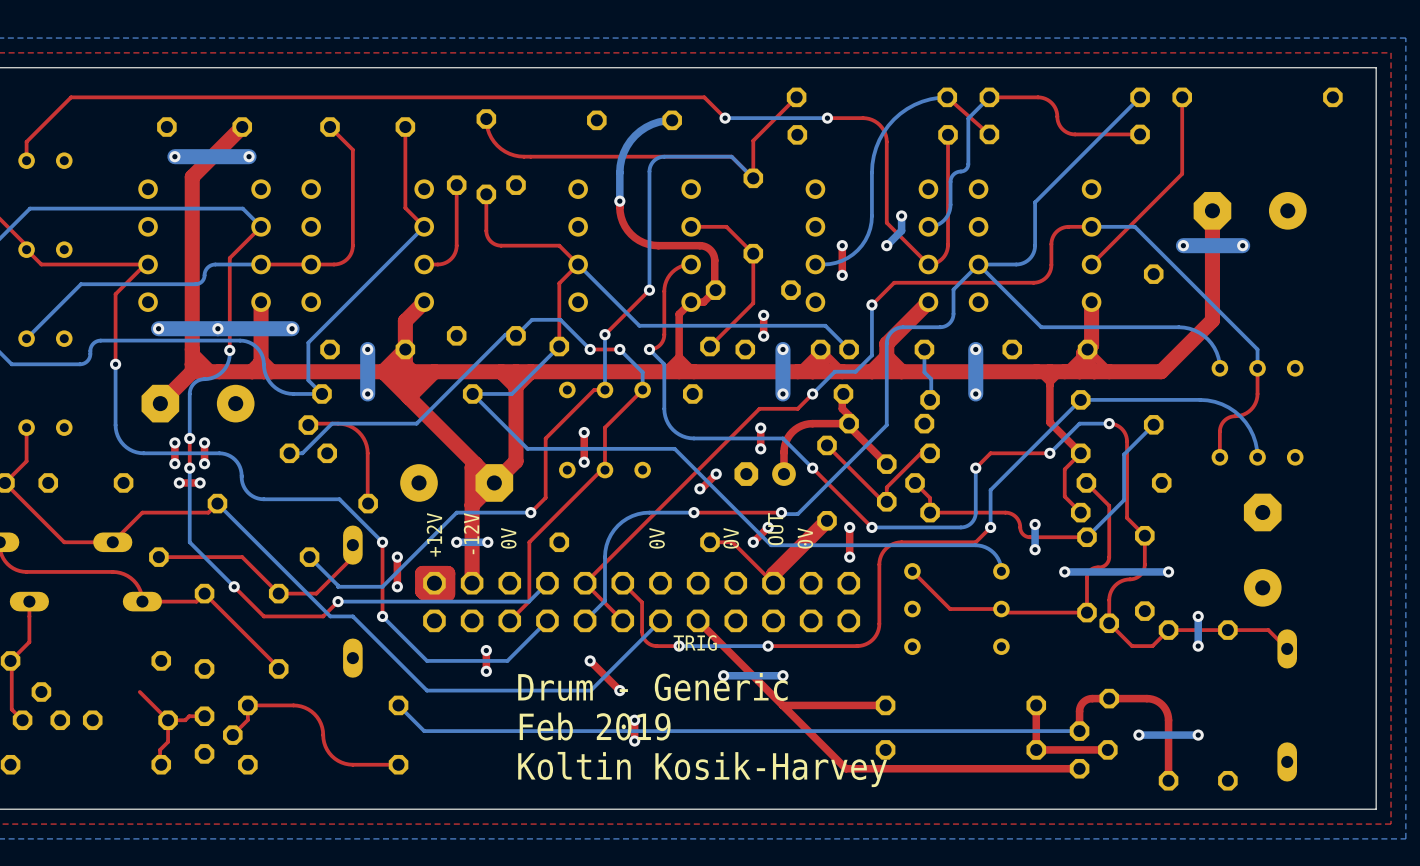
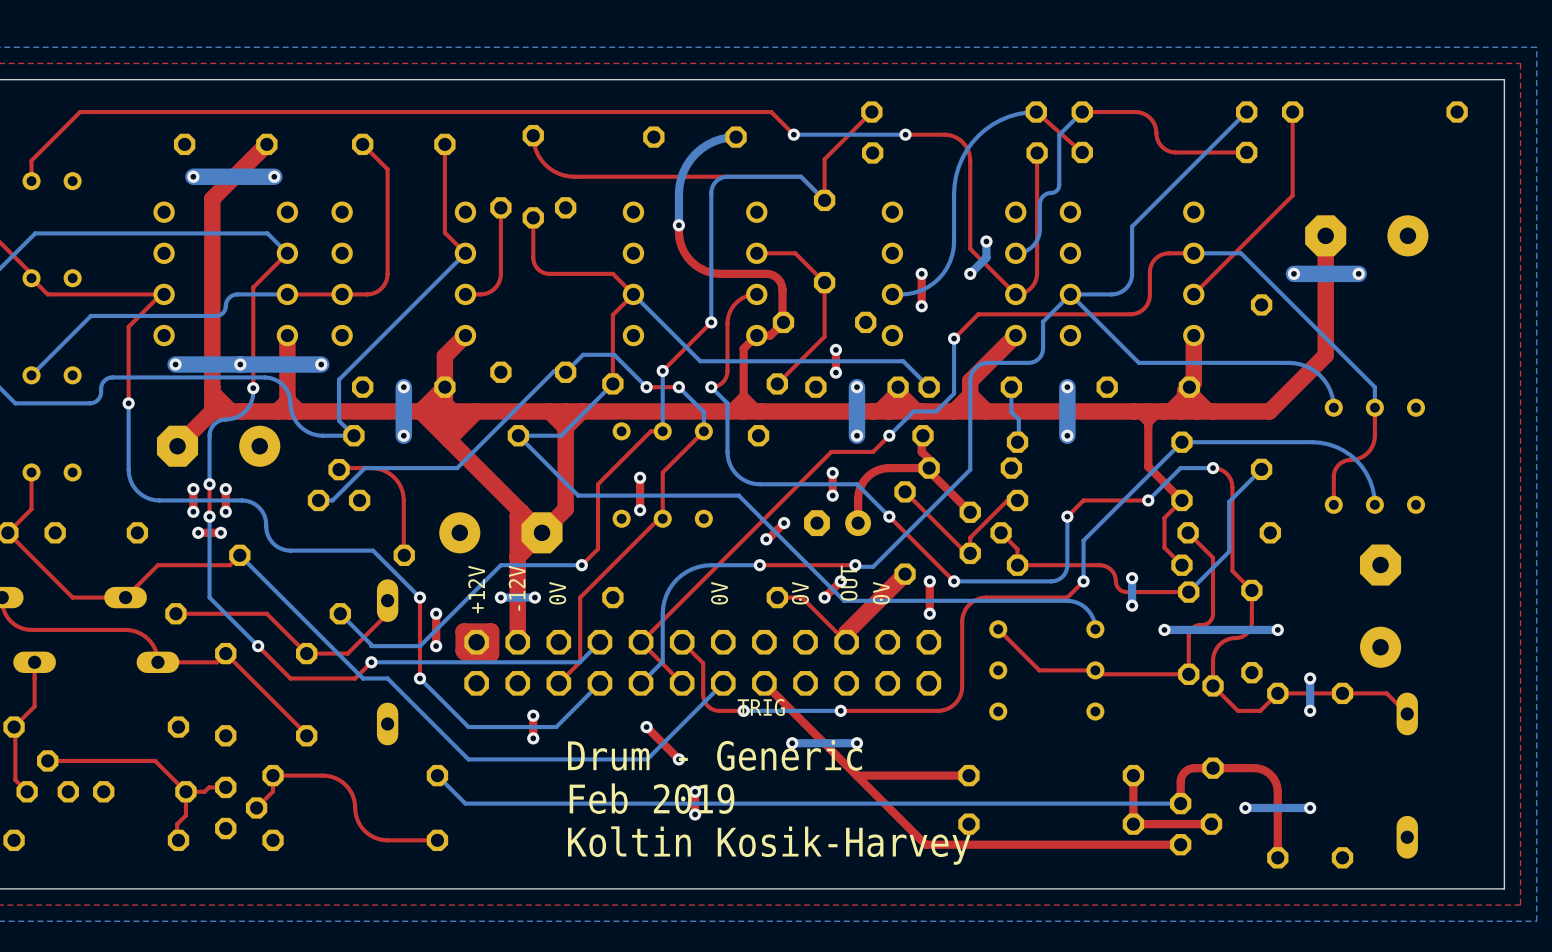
top track: none -> (155, 760) (47, 760)

